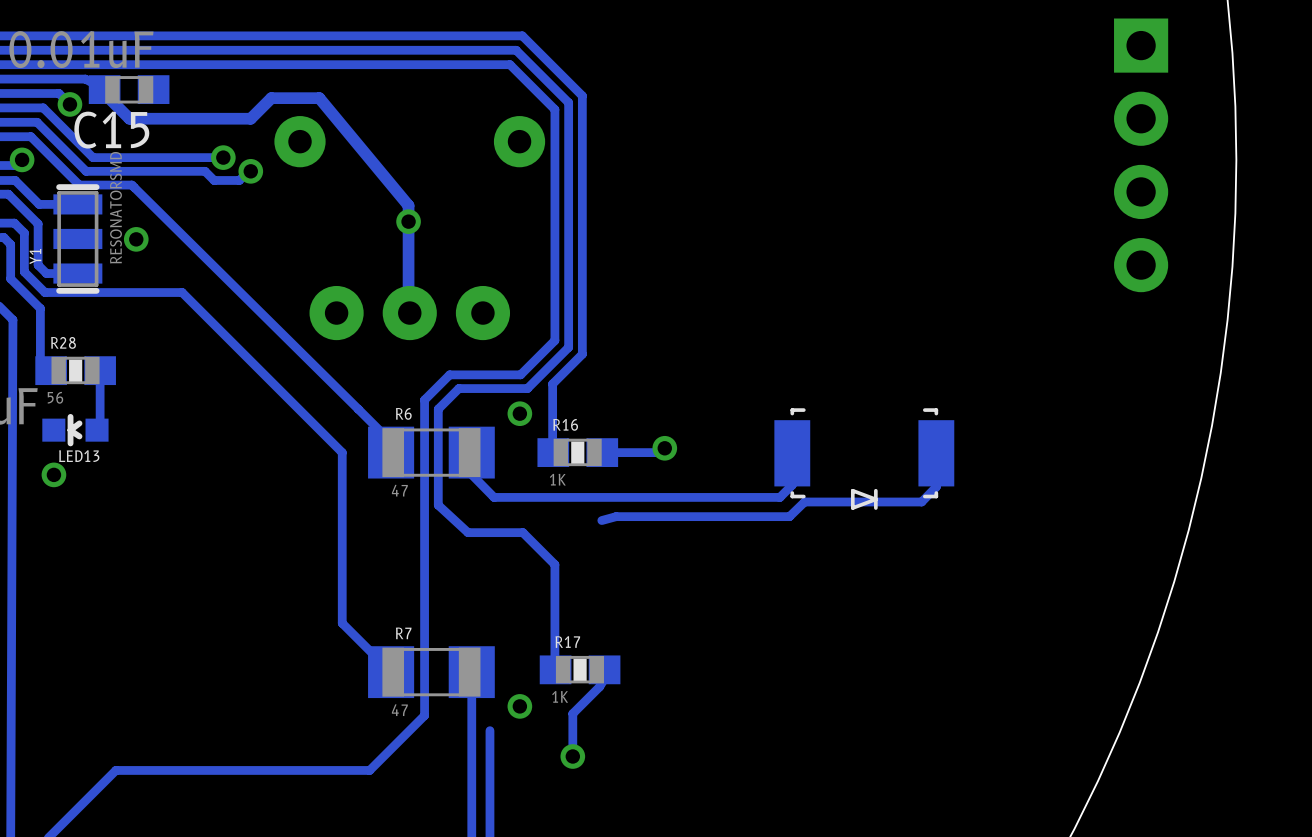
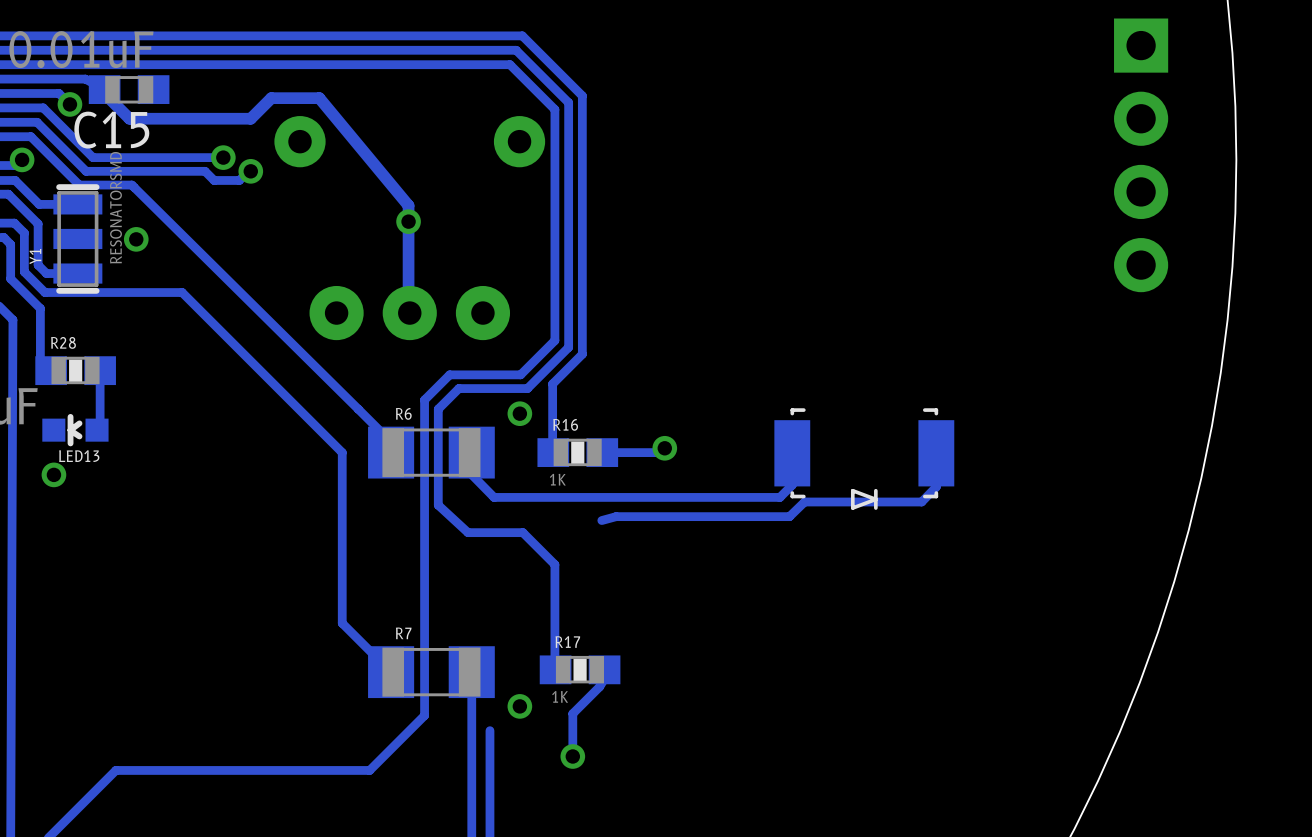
R28 value: 56 (55, 397) -> none
R6 value: 47 (399, 490) -> none
R7 value: 47 (399, 710) -> none

